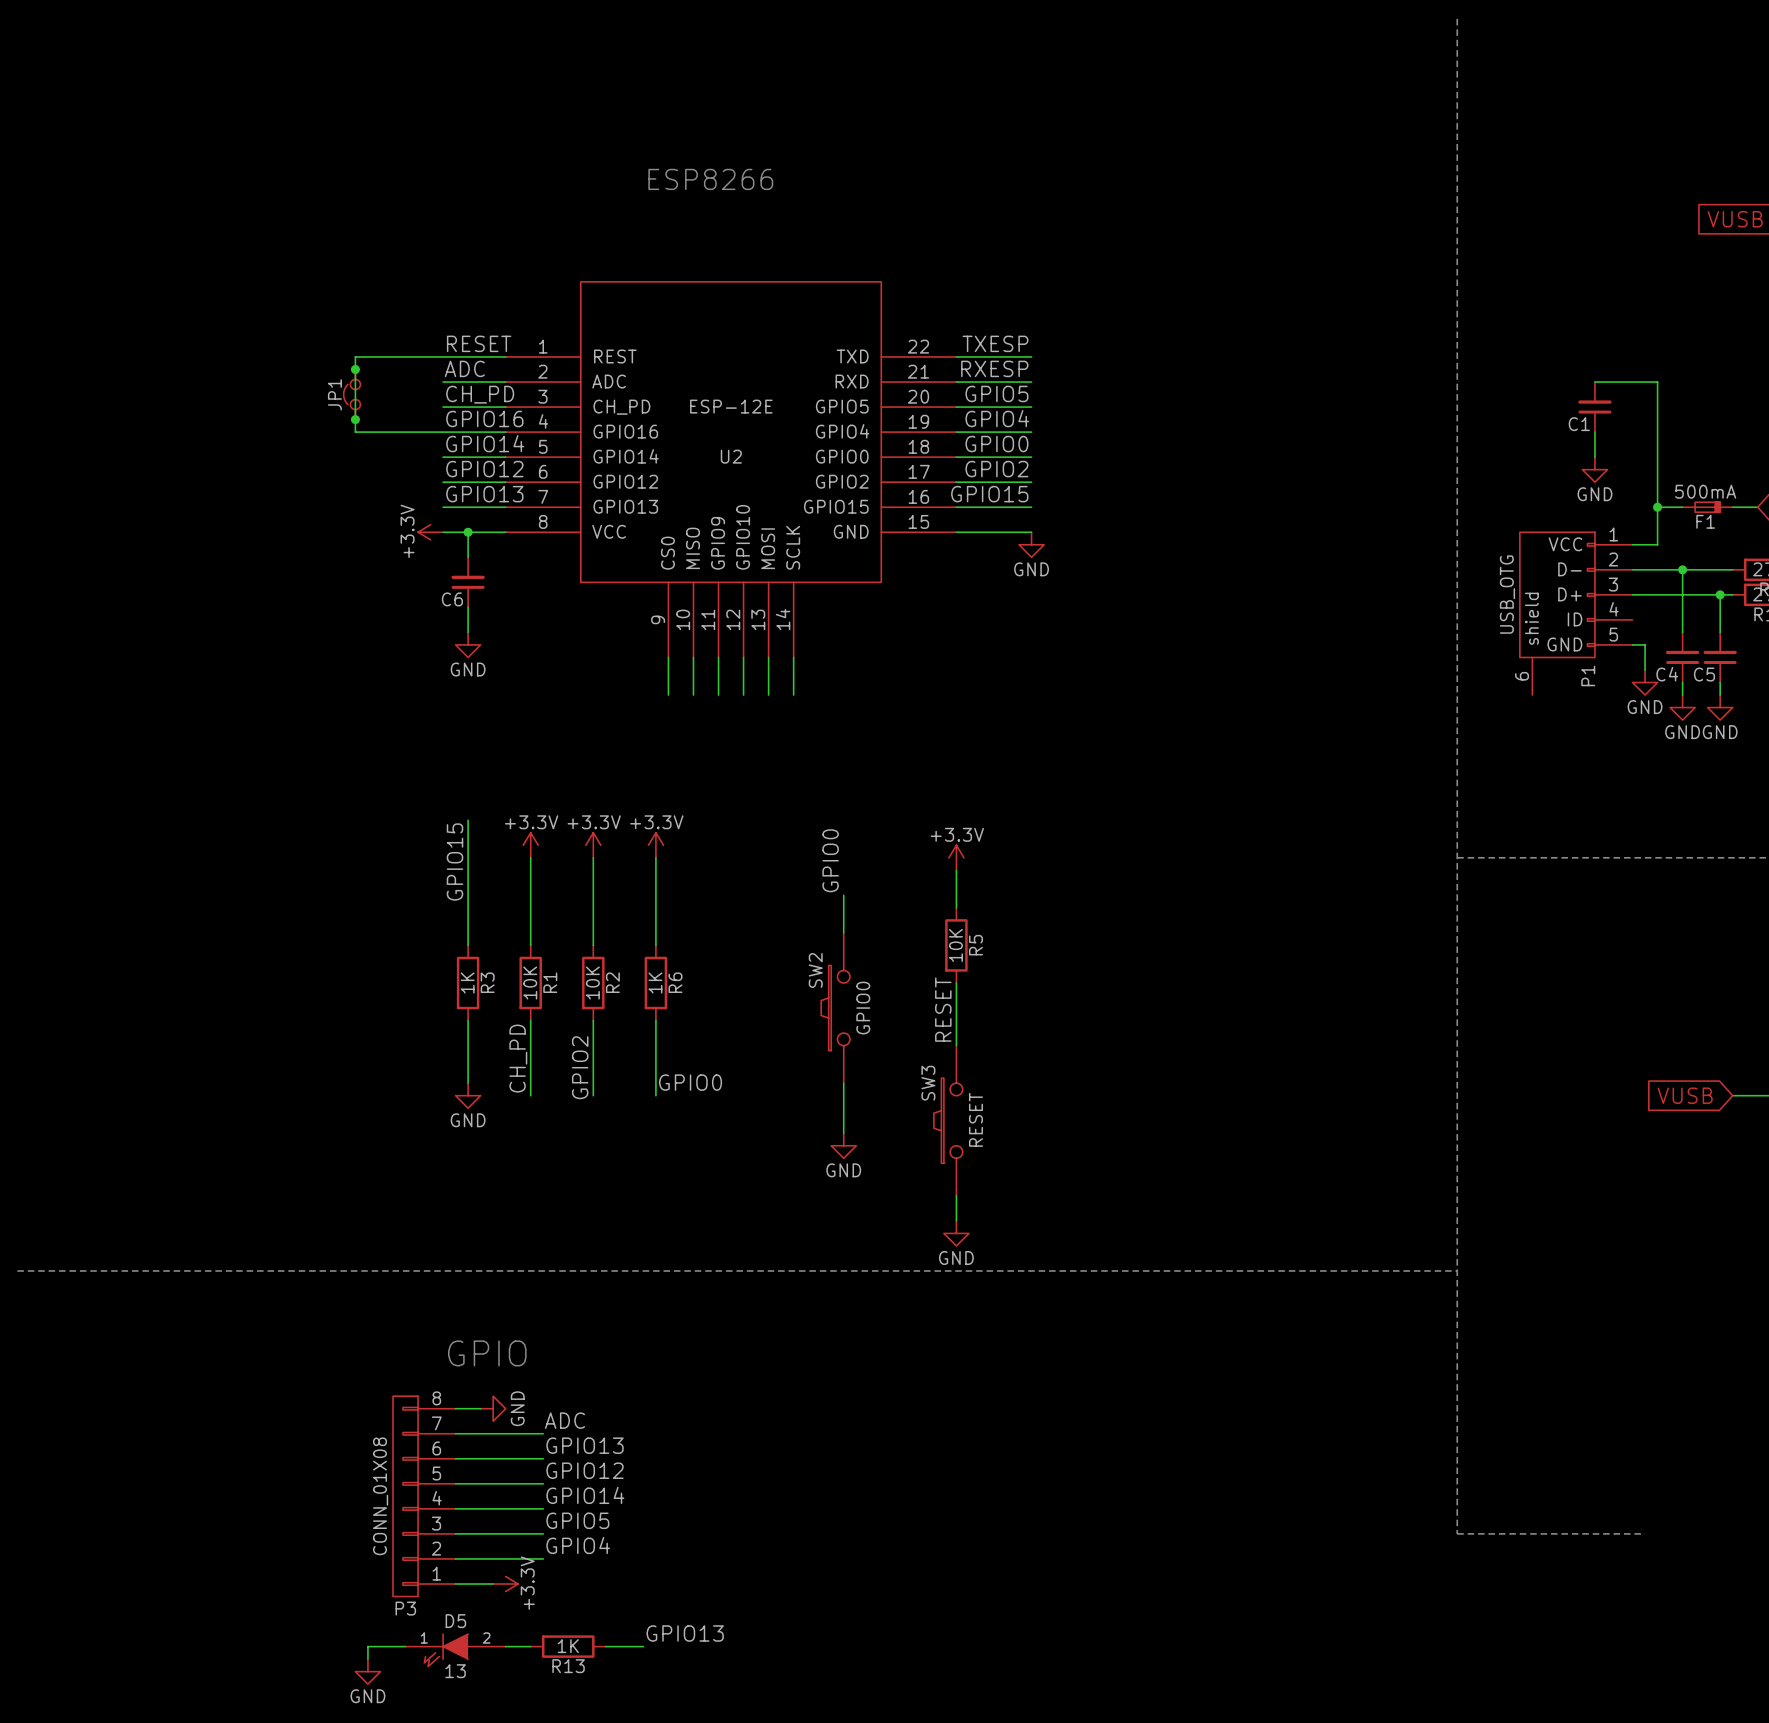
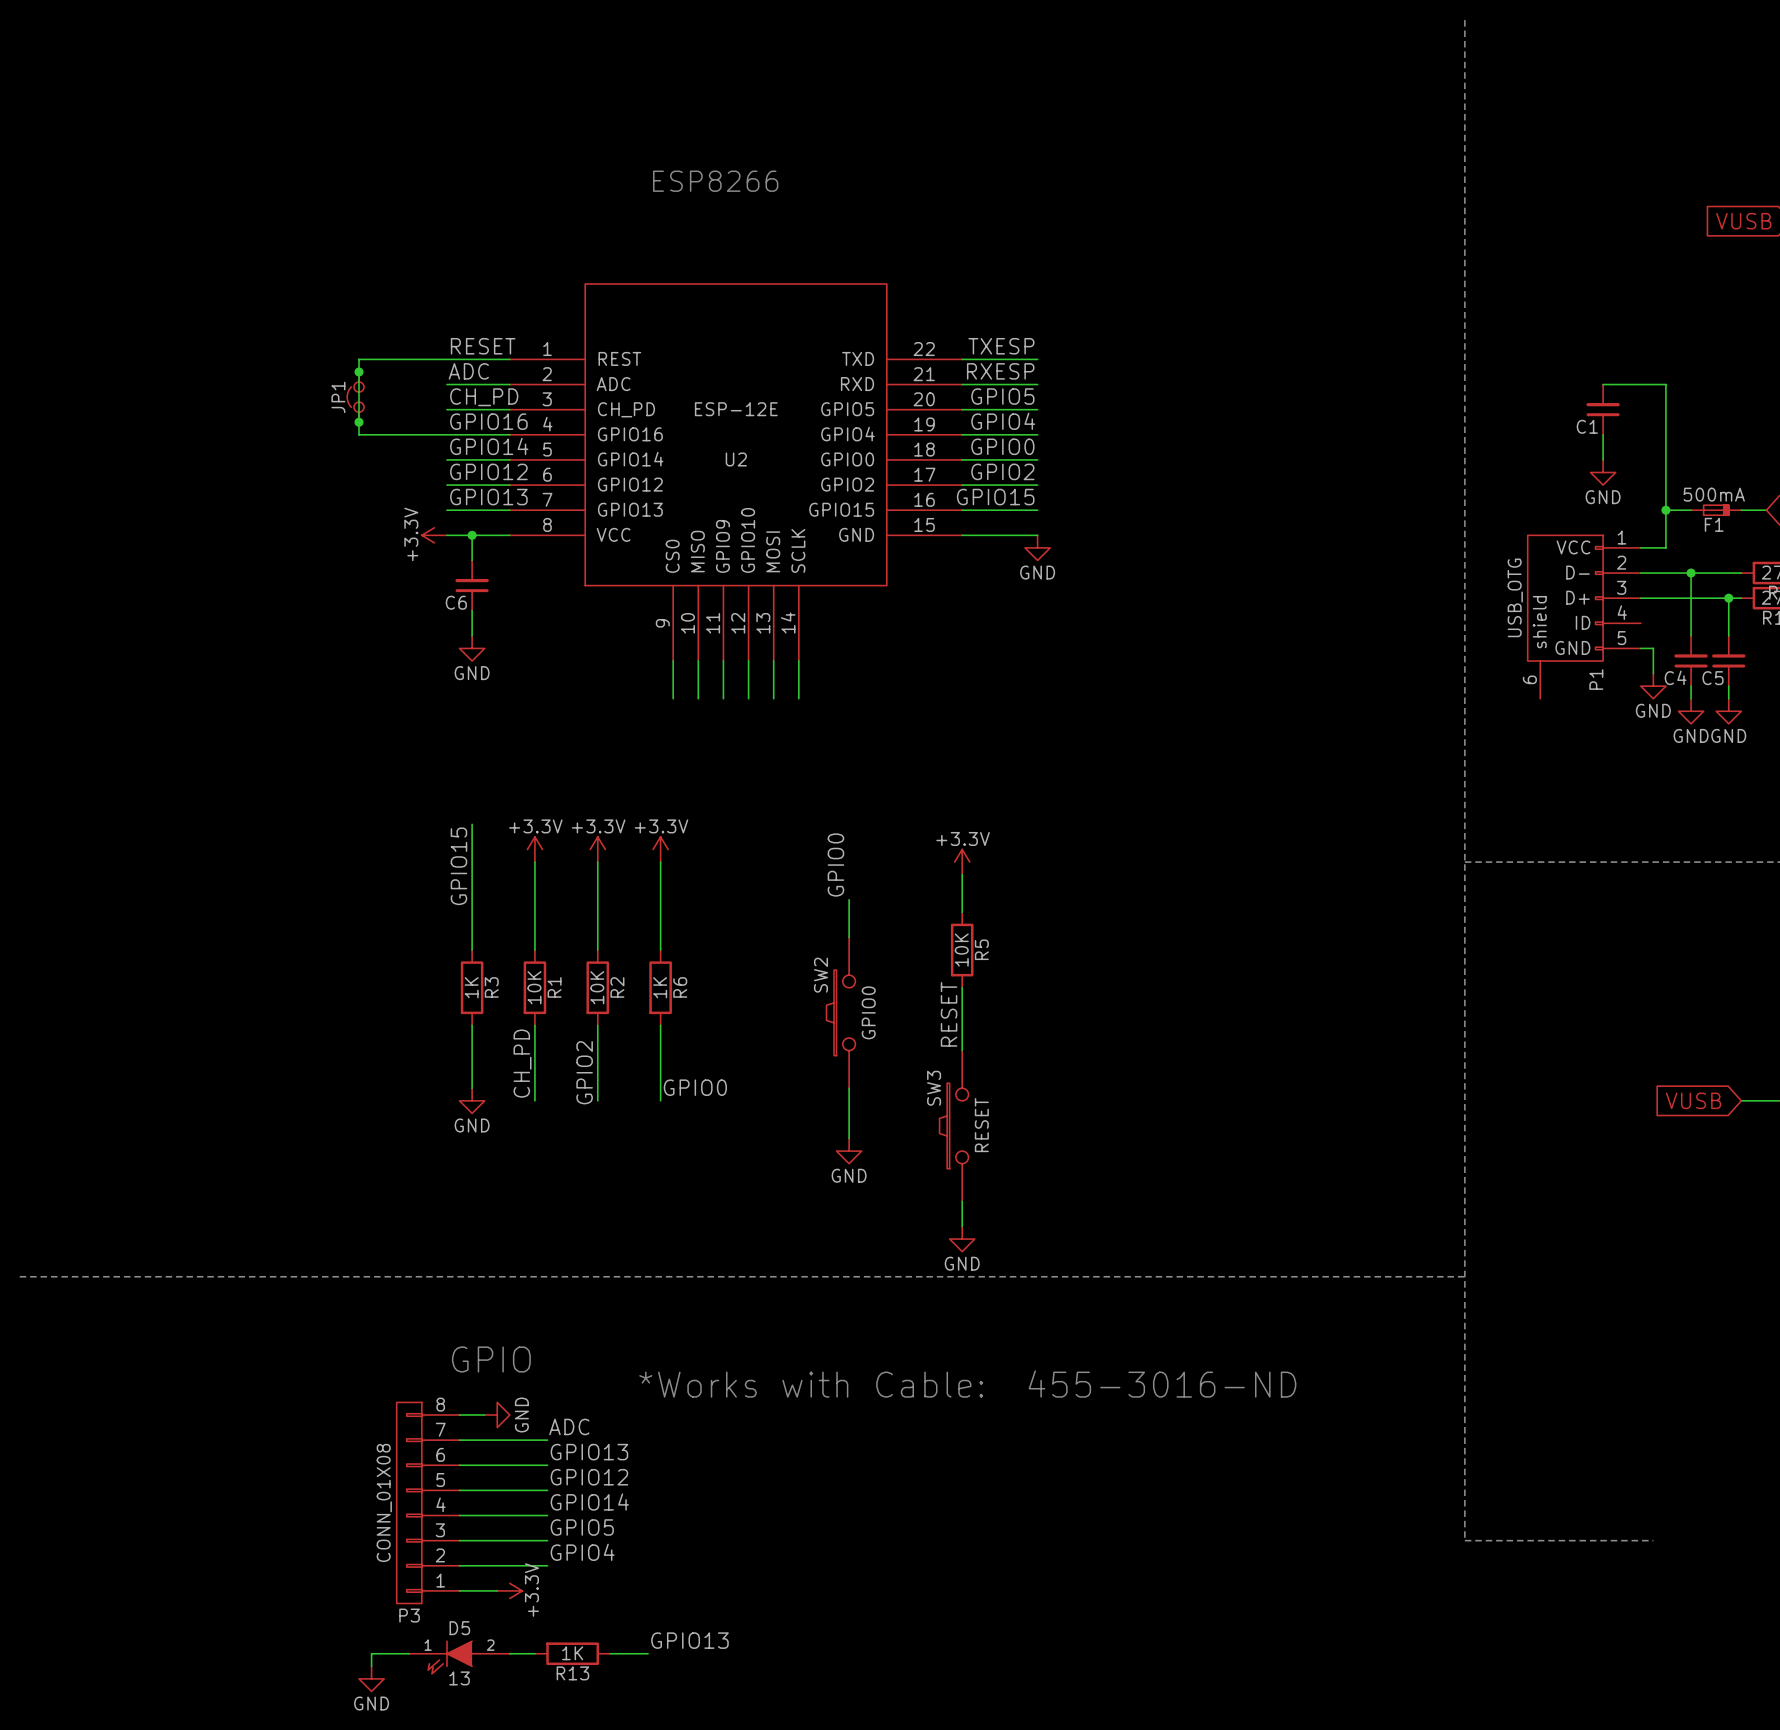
text: none -> *Works with Cable: 455-3016-ND (967, 1384)

